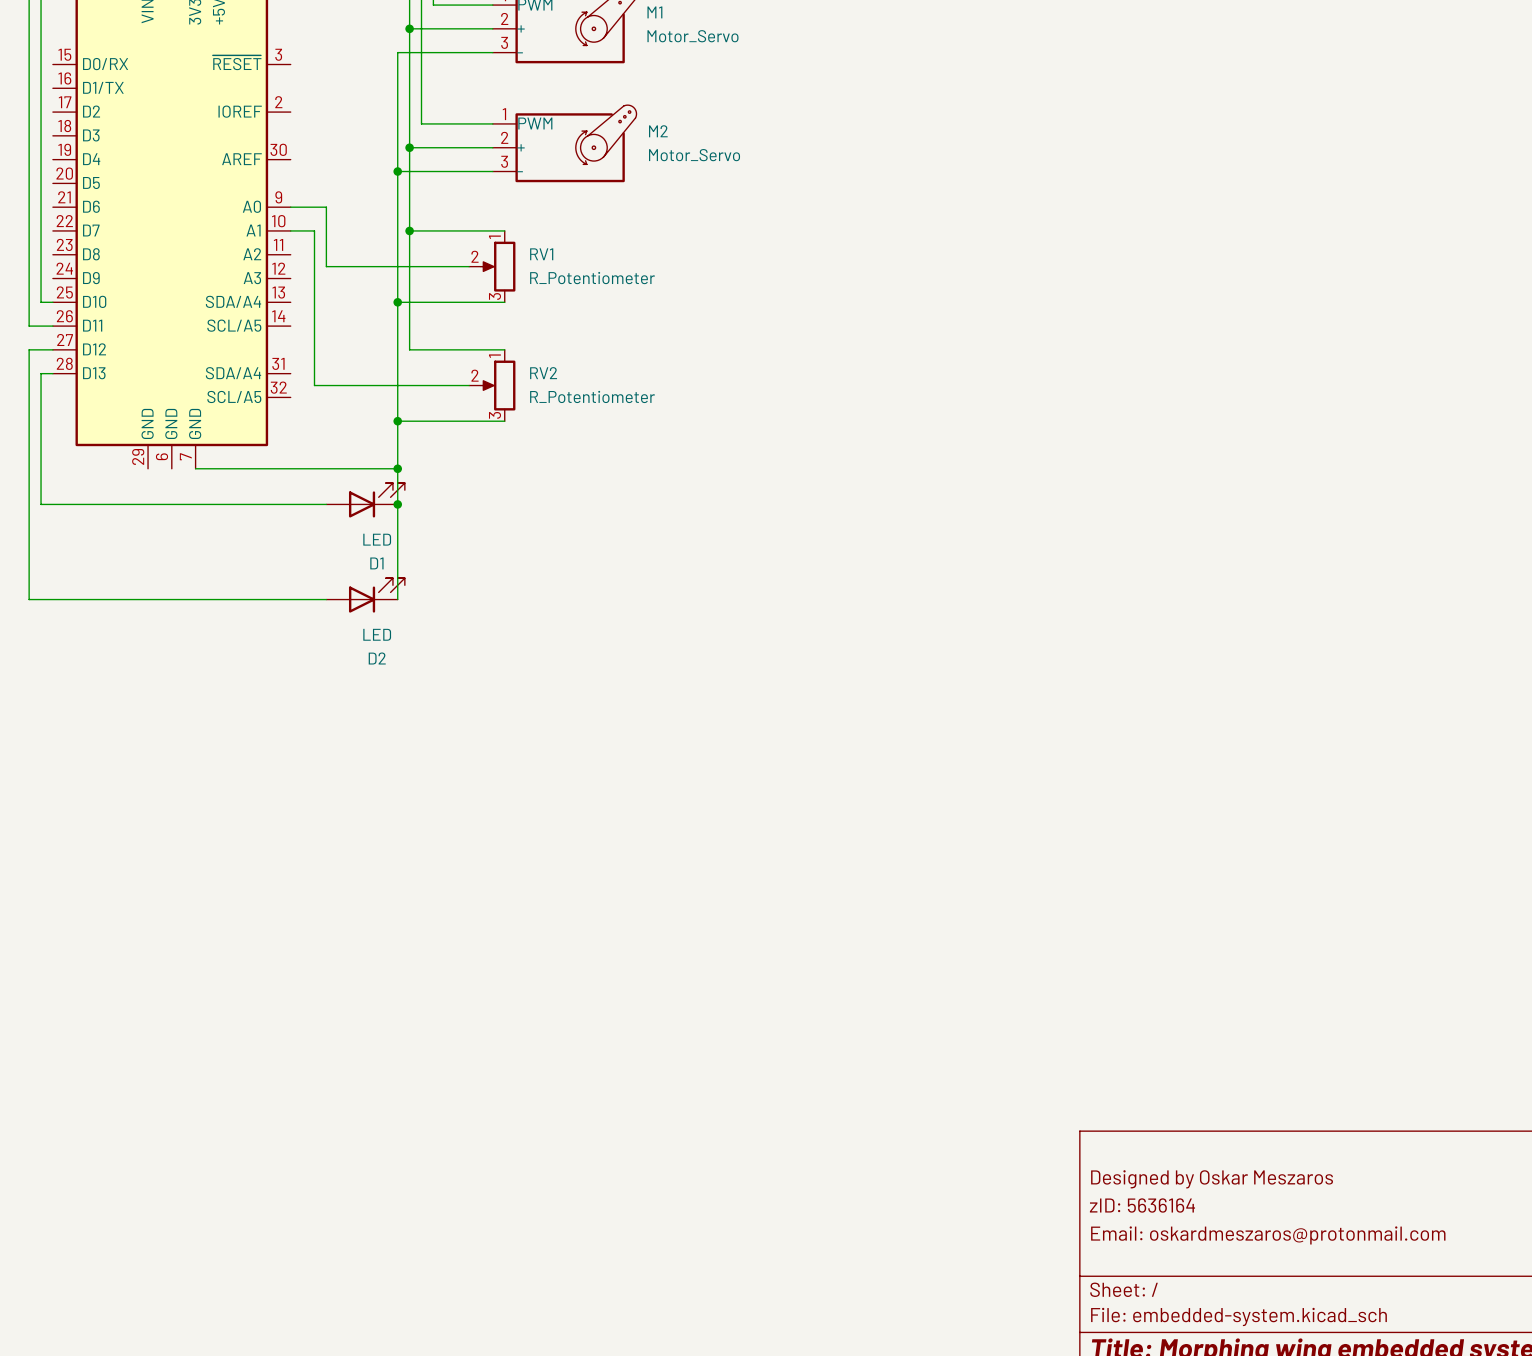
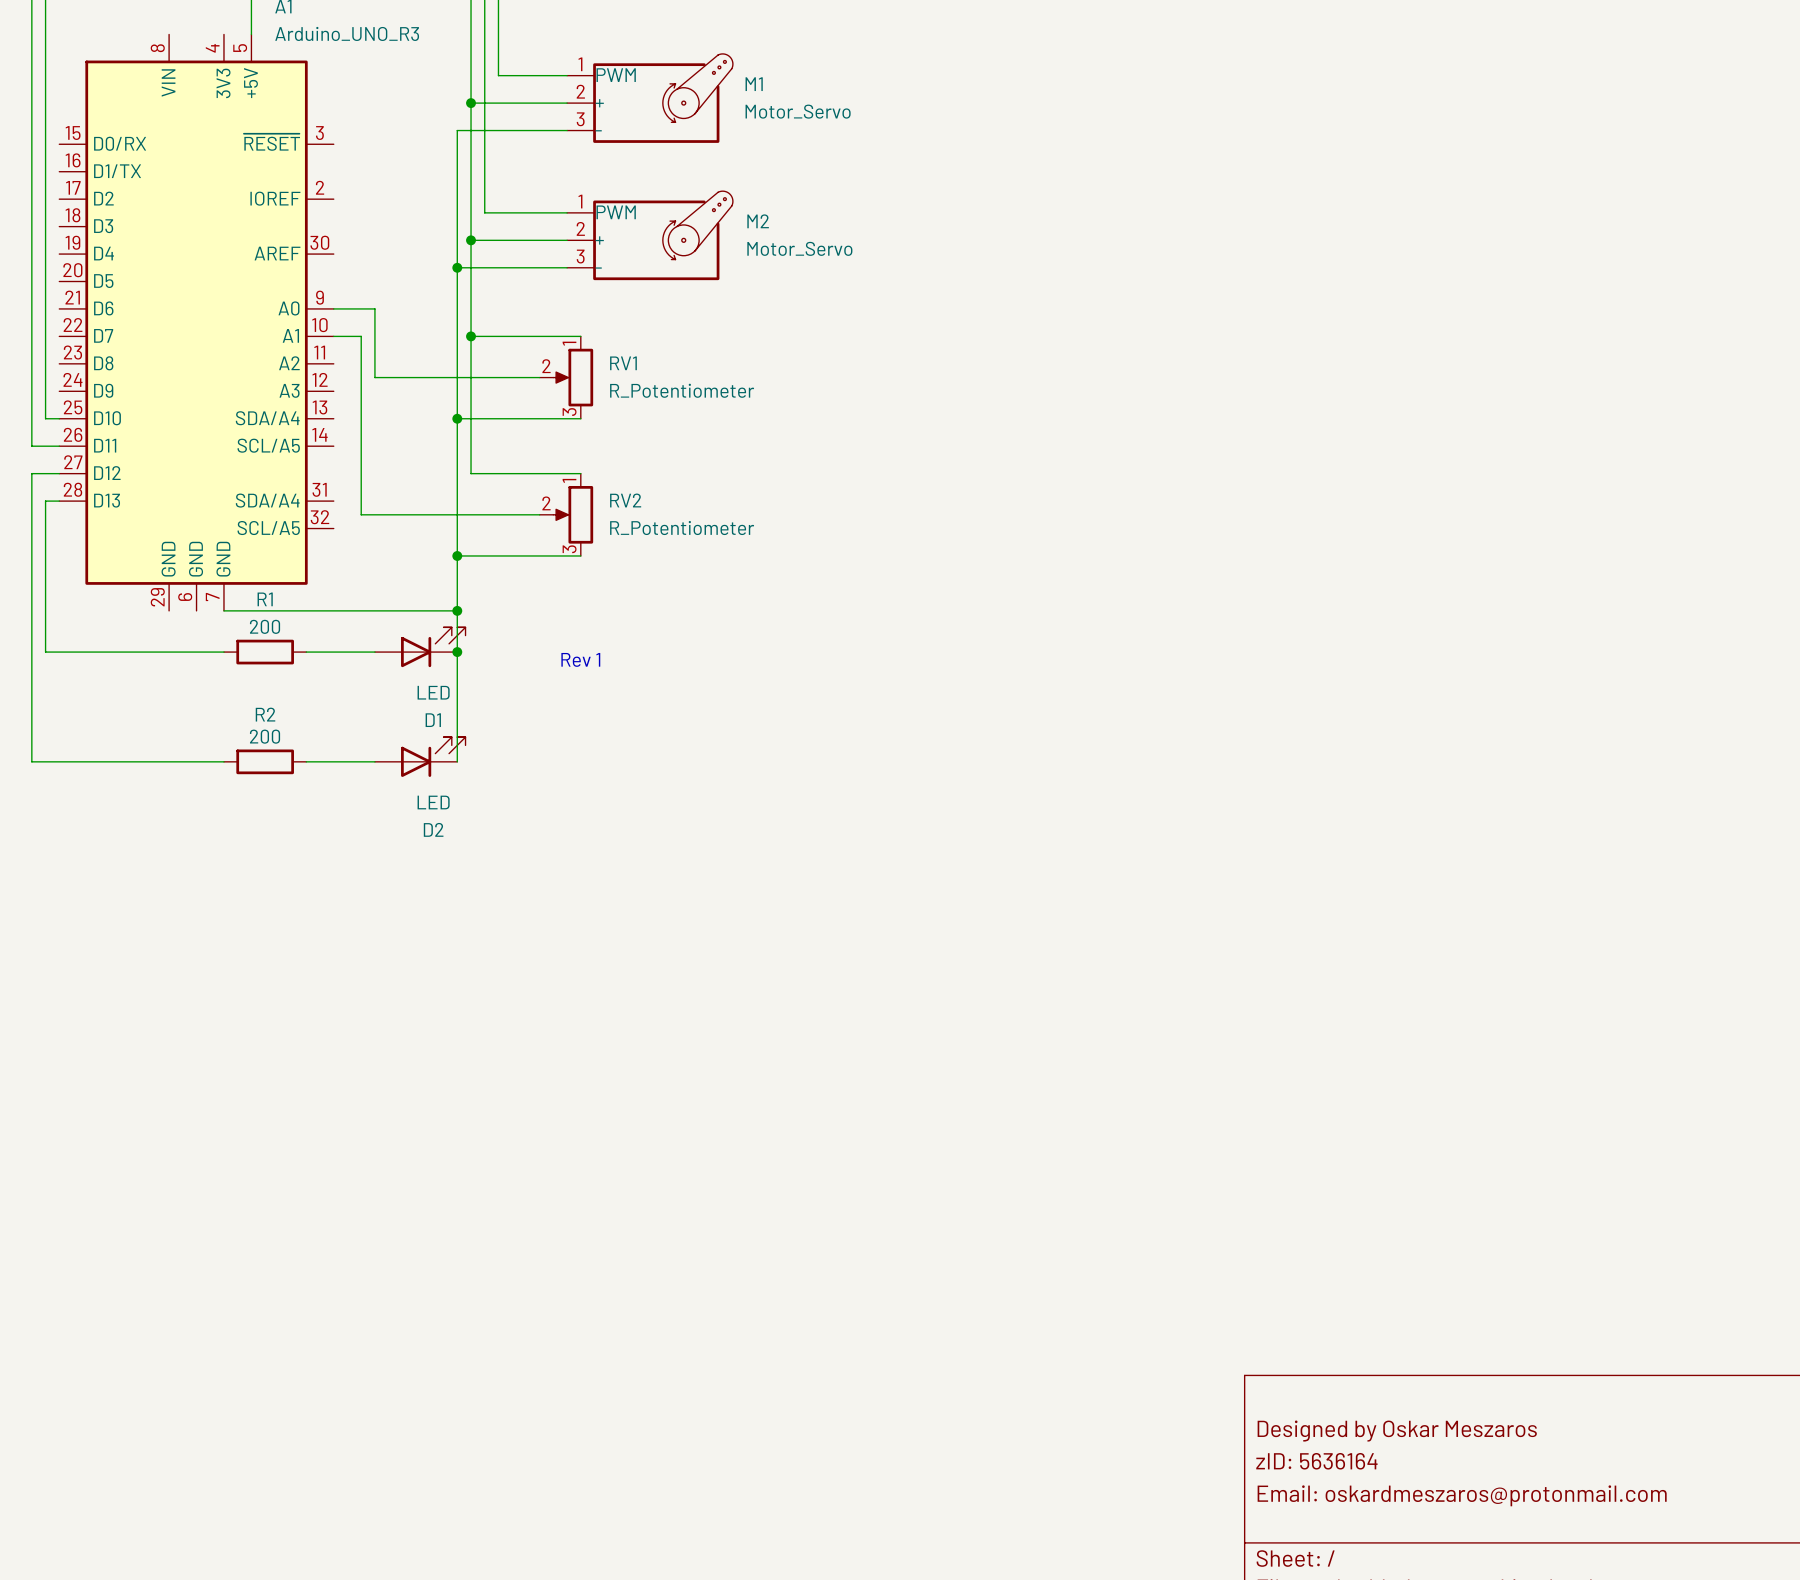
wire: (195, 504) (266, 504) -> none
R1: none -> 200 (265, 652)
text: none -> Rev 1 (580, 659)
wire: (195, 599) (266, 599) -> none
R2: none -> 200 (265, 761)

